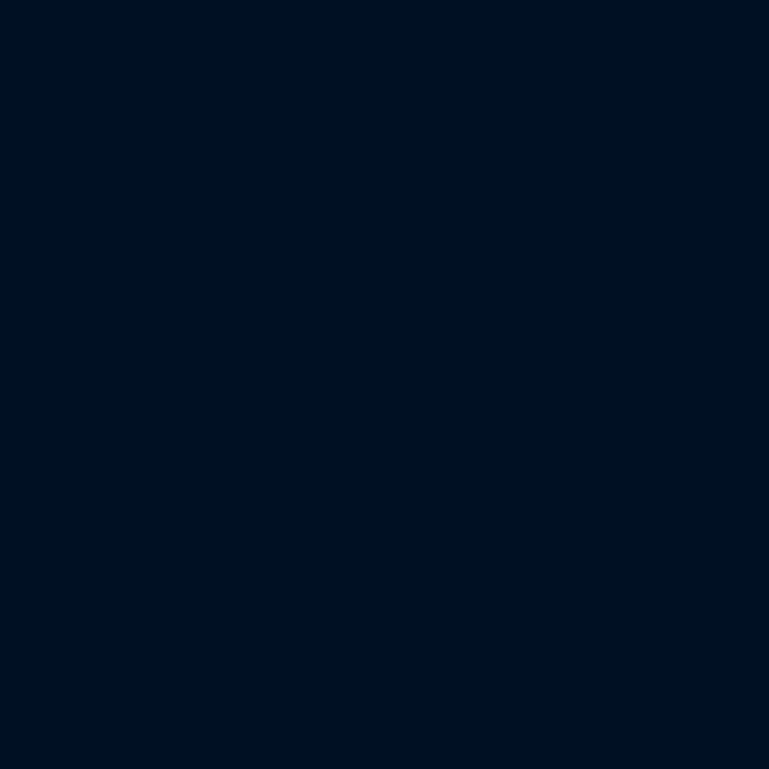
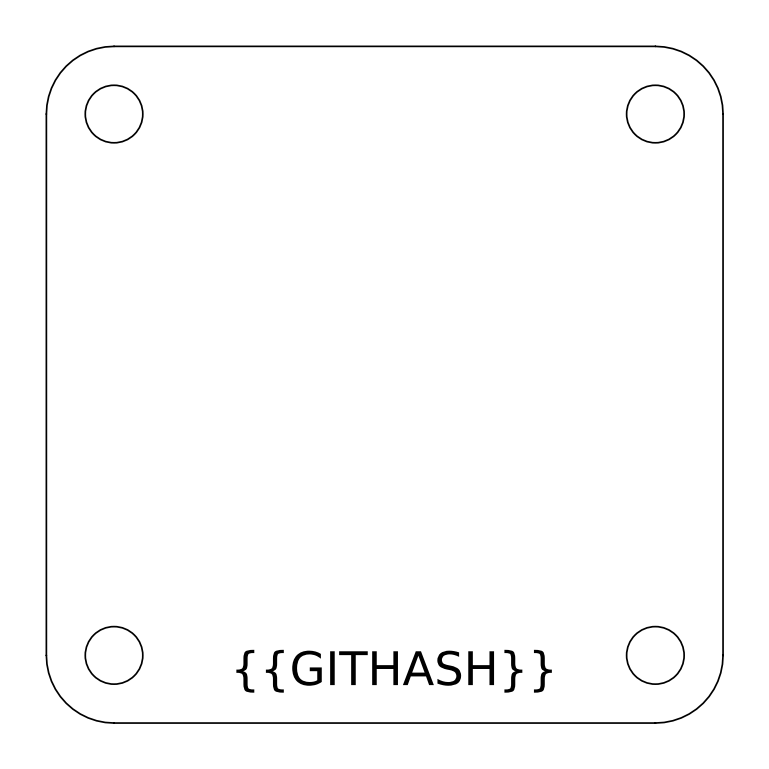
board edge: none -> (114, 46) (655, 46) (681, 51) (703, 66) (717, 88) (723, 114) (723, 655) (717, 681) (703, 703) (681, 717) (655, 723) (114, 723) (88, 717) (66, 703) (51, 681) (46, 655) (46, 105) (55, 80) (66, 66) (88, 51) (114, 46)
round board edge: none -> [84, 84, 144, 144]
round board edge: none -> [625, 84, 685, 144]
round board edge: none -> [84, 625, 144, 685]
round board edge: none -> [625, 625, 685, 685]
text: none -> {{GITHASH}} (394, 671)

